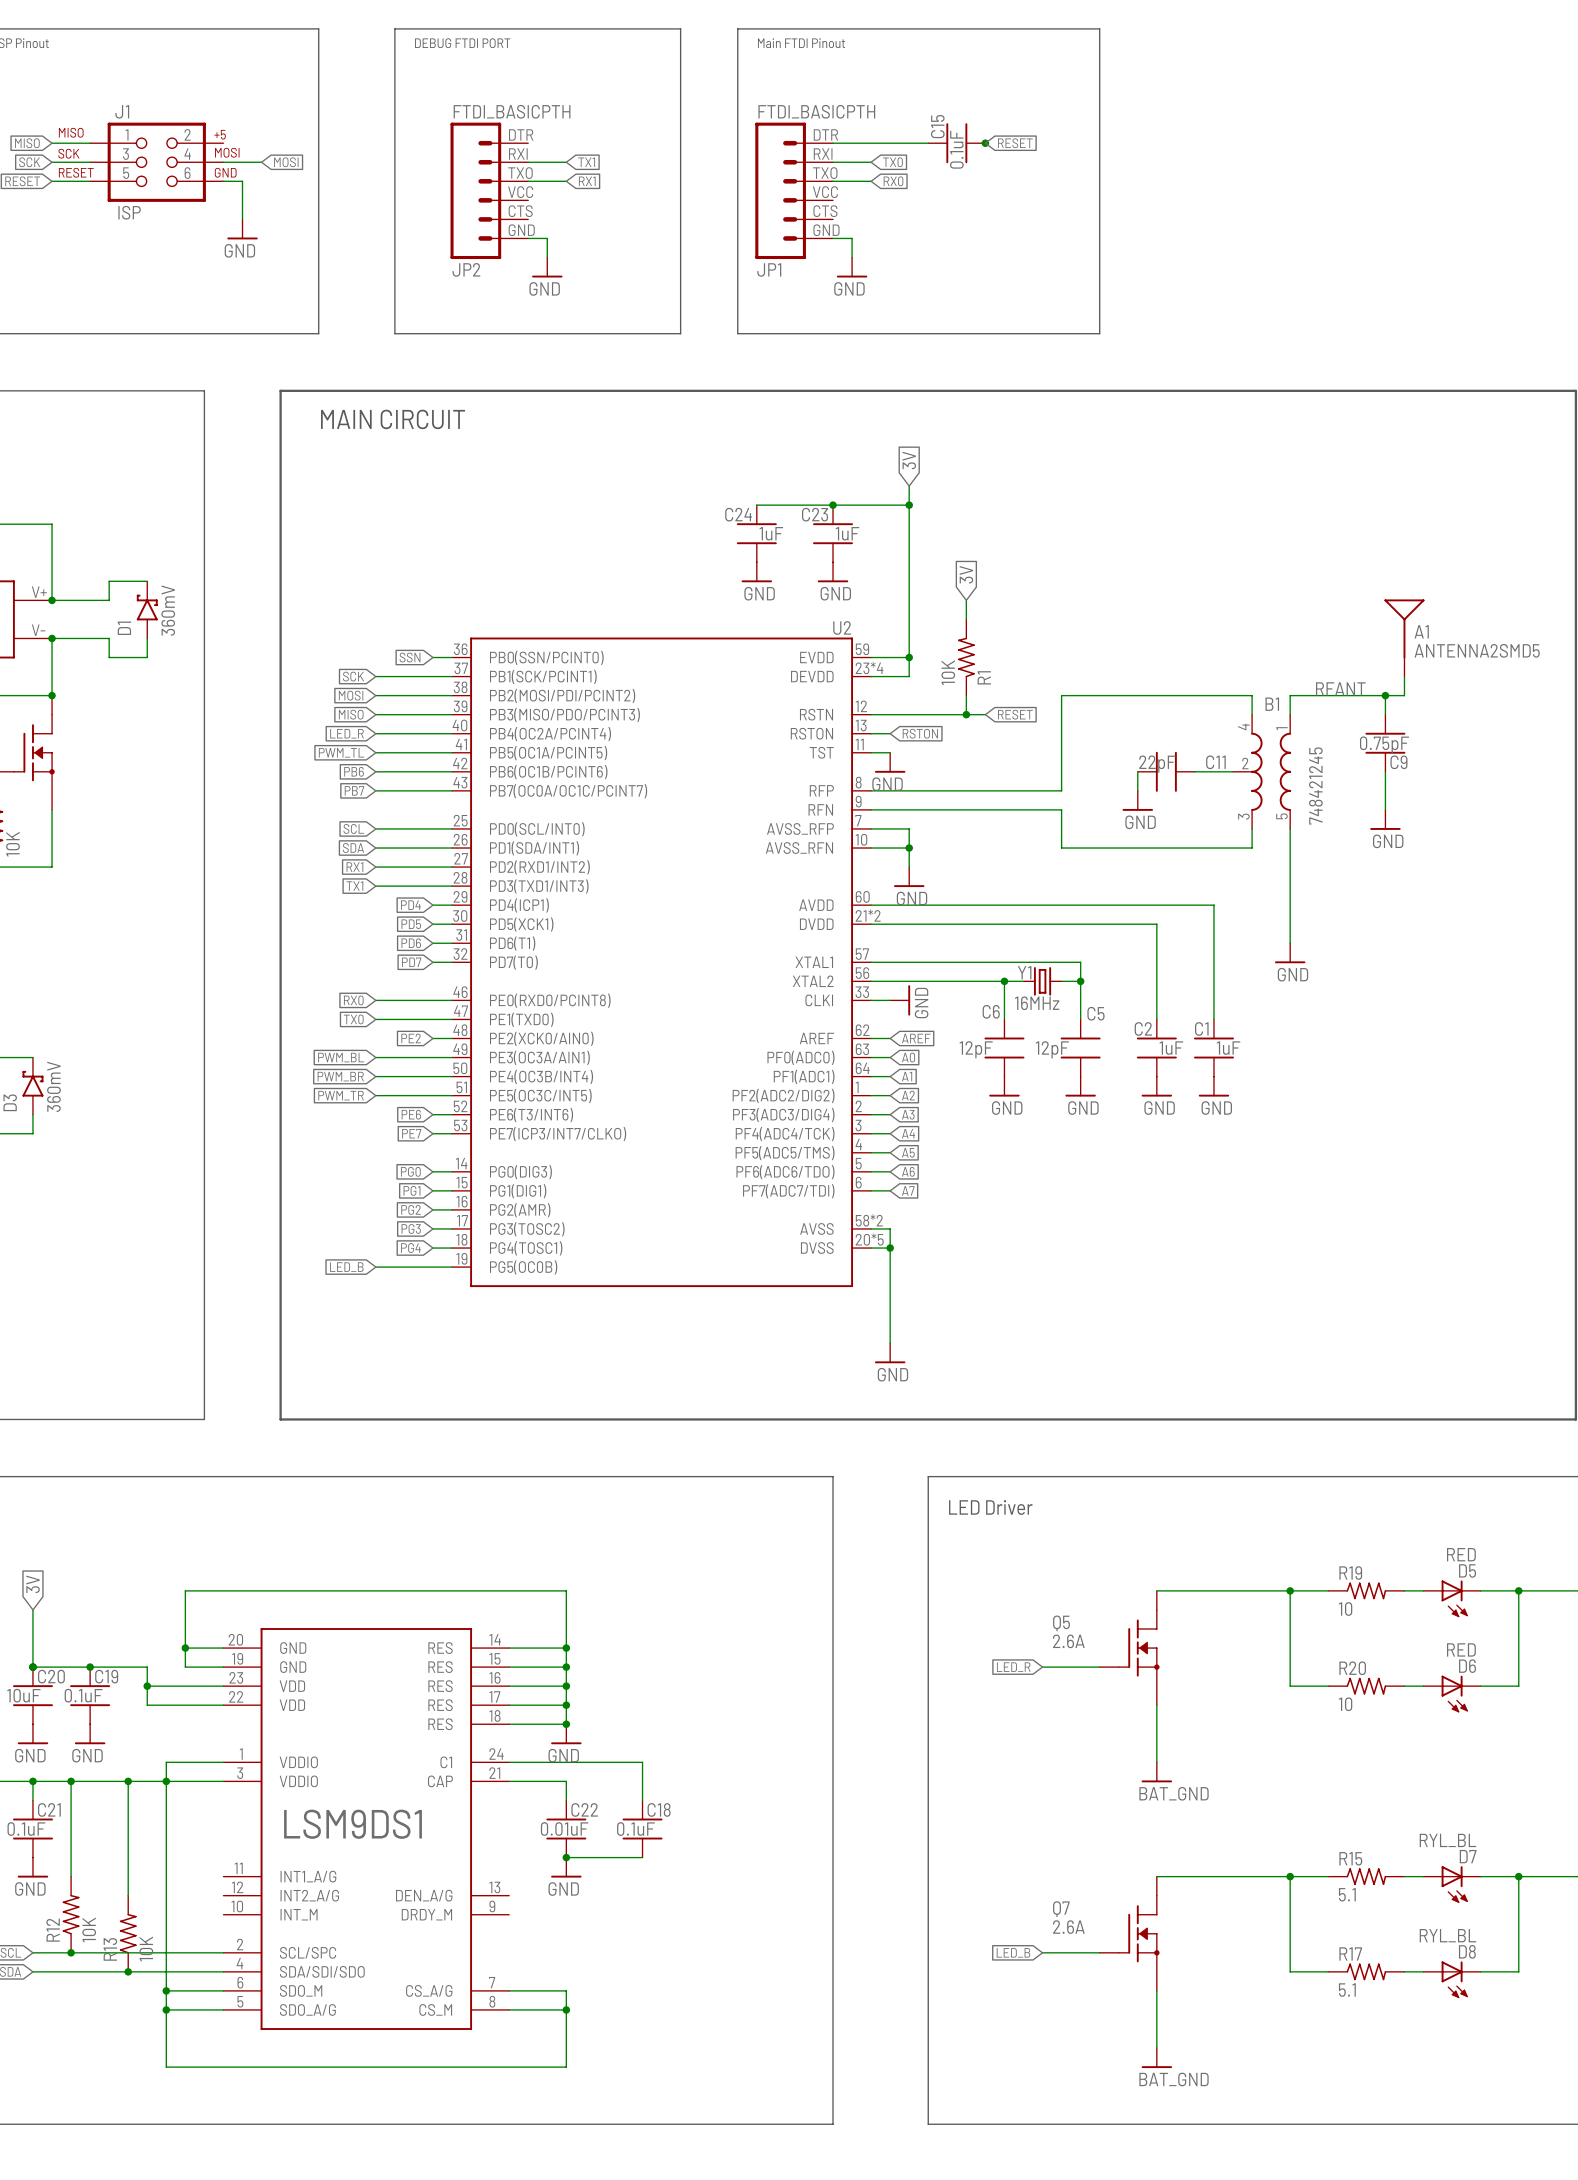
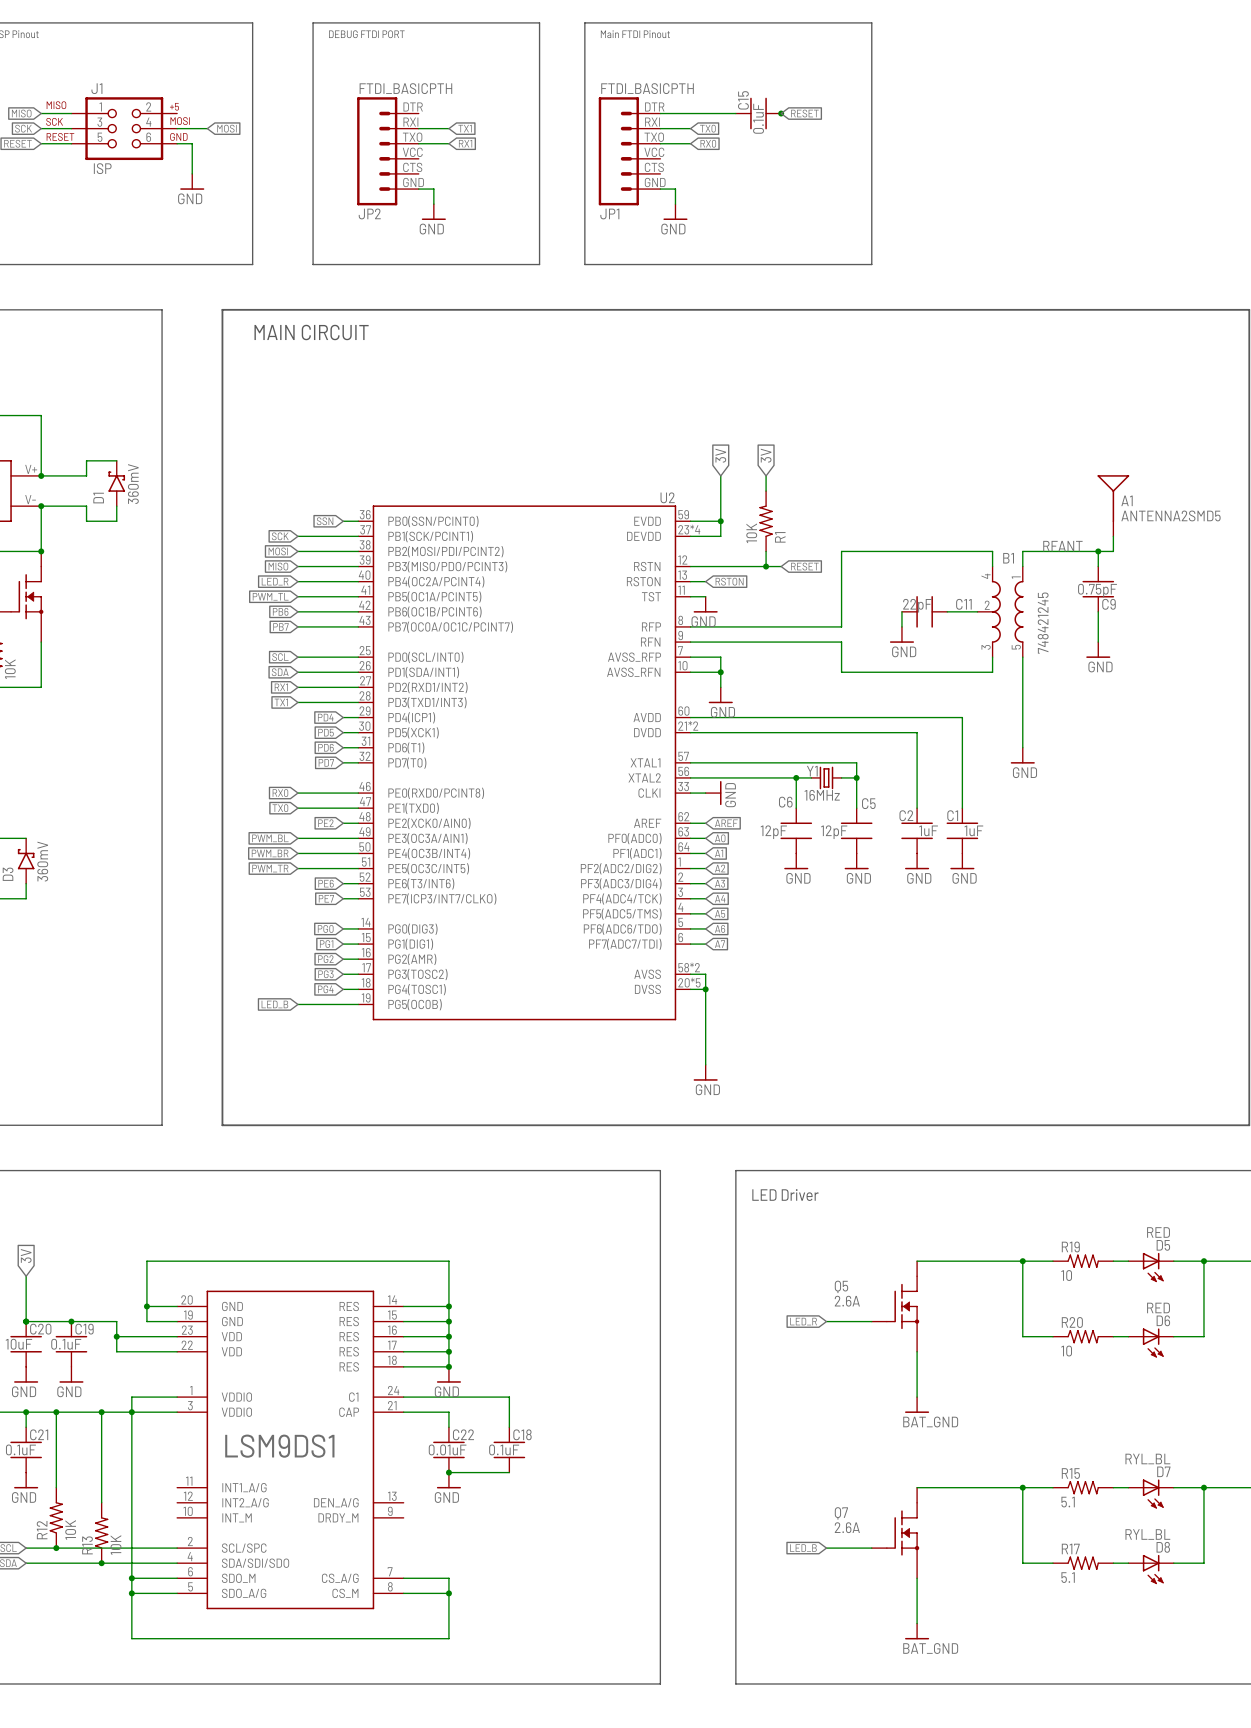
global label position: 3V (909, 460) -> 3V (720, 455)
wire: (909, 486) (909, 600) -> none
wire: (756, 505) (909, 505) -> none
junction: (833, 505) -> none
junction: (909, 505) -> none
C24: 1uF (756, 533) -> none
C23: 1uF (833, 533) -> none
power symbol: GND (756, 572) -> none
power symbol: GND (833, 572) -> none

